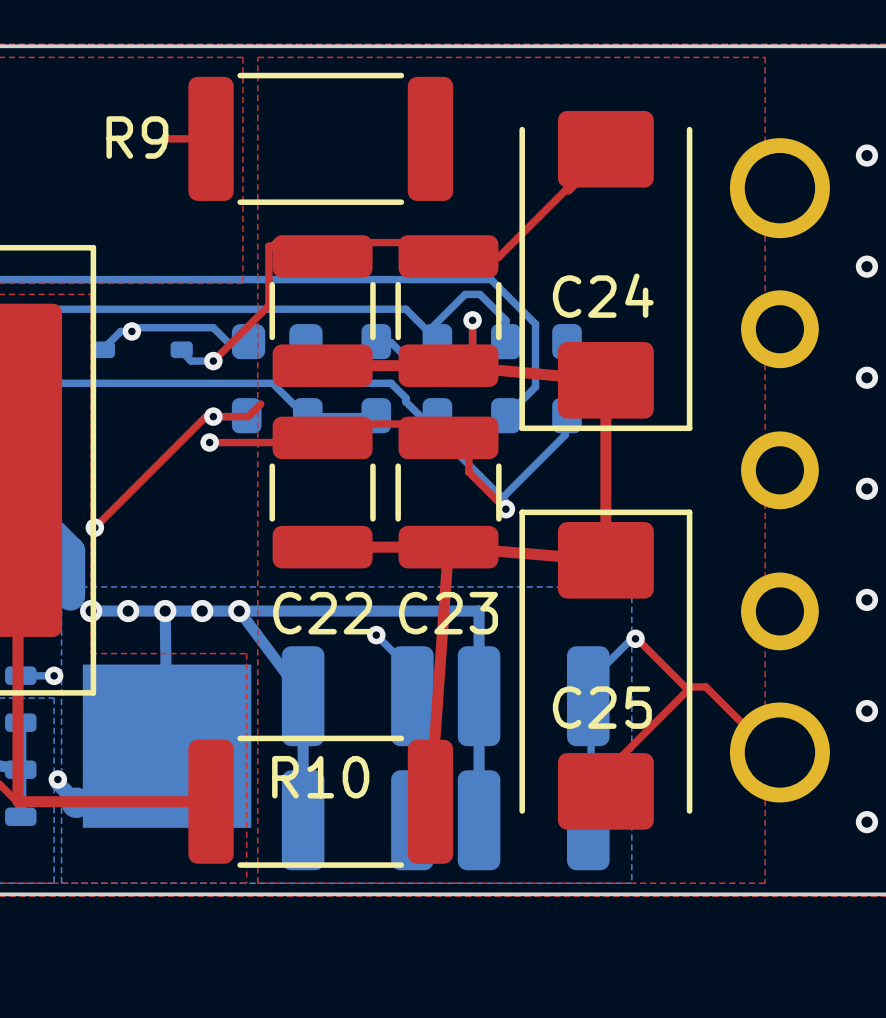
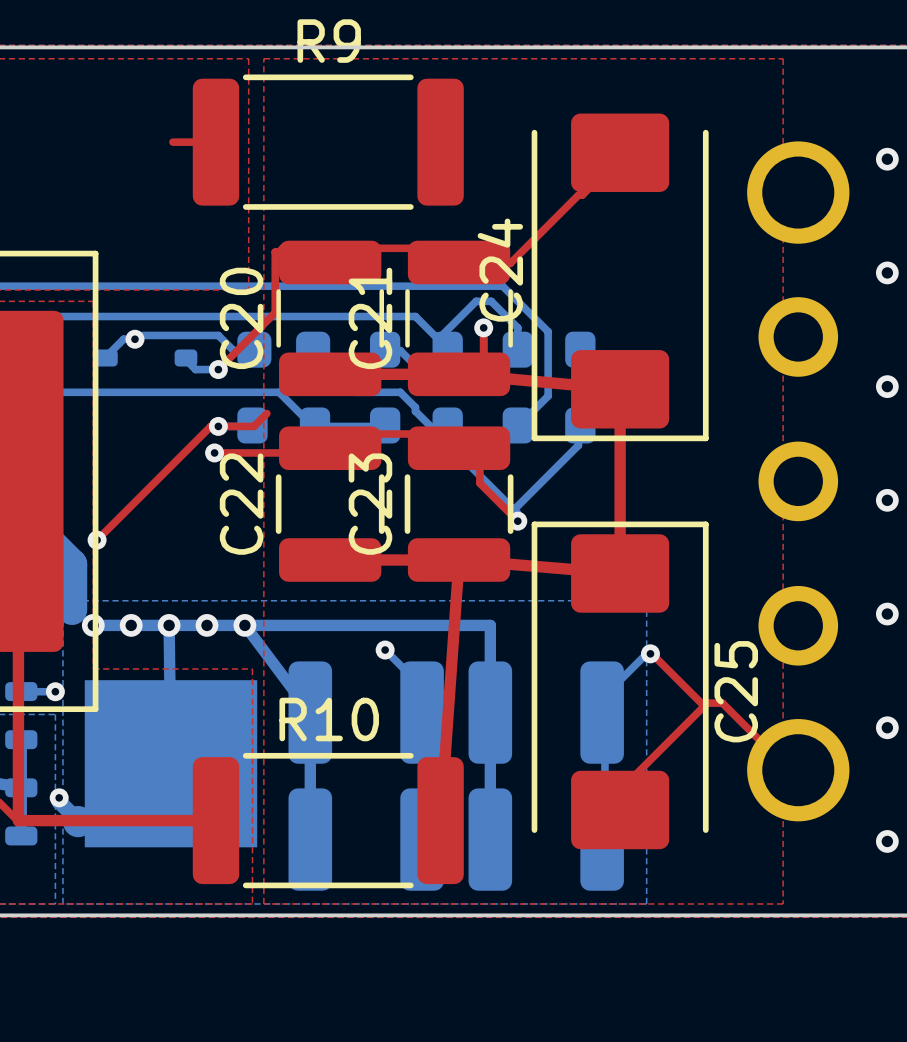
R9 name position: R9 (137, 137) -> R9 (329, 41)
C24 name rotation: 0° (603, 295) -> 90° counterclockwise (500, 270)
part: (322, 311) -> none
C20: none -> (330, 318)
part: (448, 311) -> none
C21: none -> (459, 318)
C22 name rotation: 0° (322, 613) -> 90° counterclockwise (241, 504)
C22 name position: C22 (322, 613) -> C22 (241, 504)
C23 name rotation: 0° (448, 613) -> 90° counterclockwise (370, 504)
C23 name position: C23 (448, 613) -> C23 (370, 504)
C25 name rotation: 0° (602, 707) -> 90° counterclockwise (736, 691)
R10 name position: R10 (320, 777) -> R10 (329, 719)

